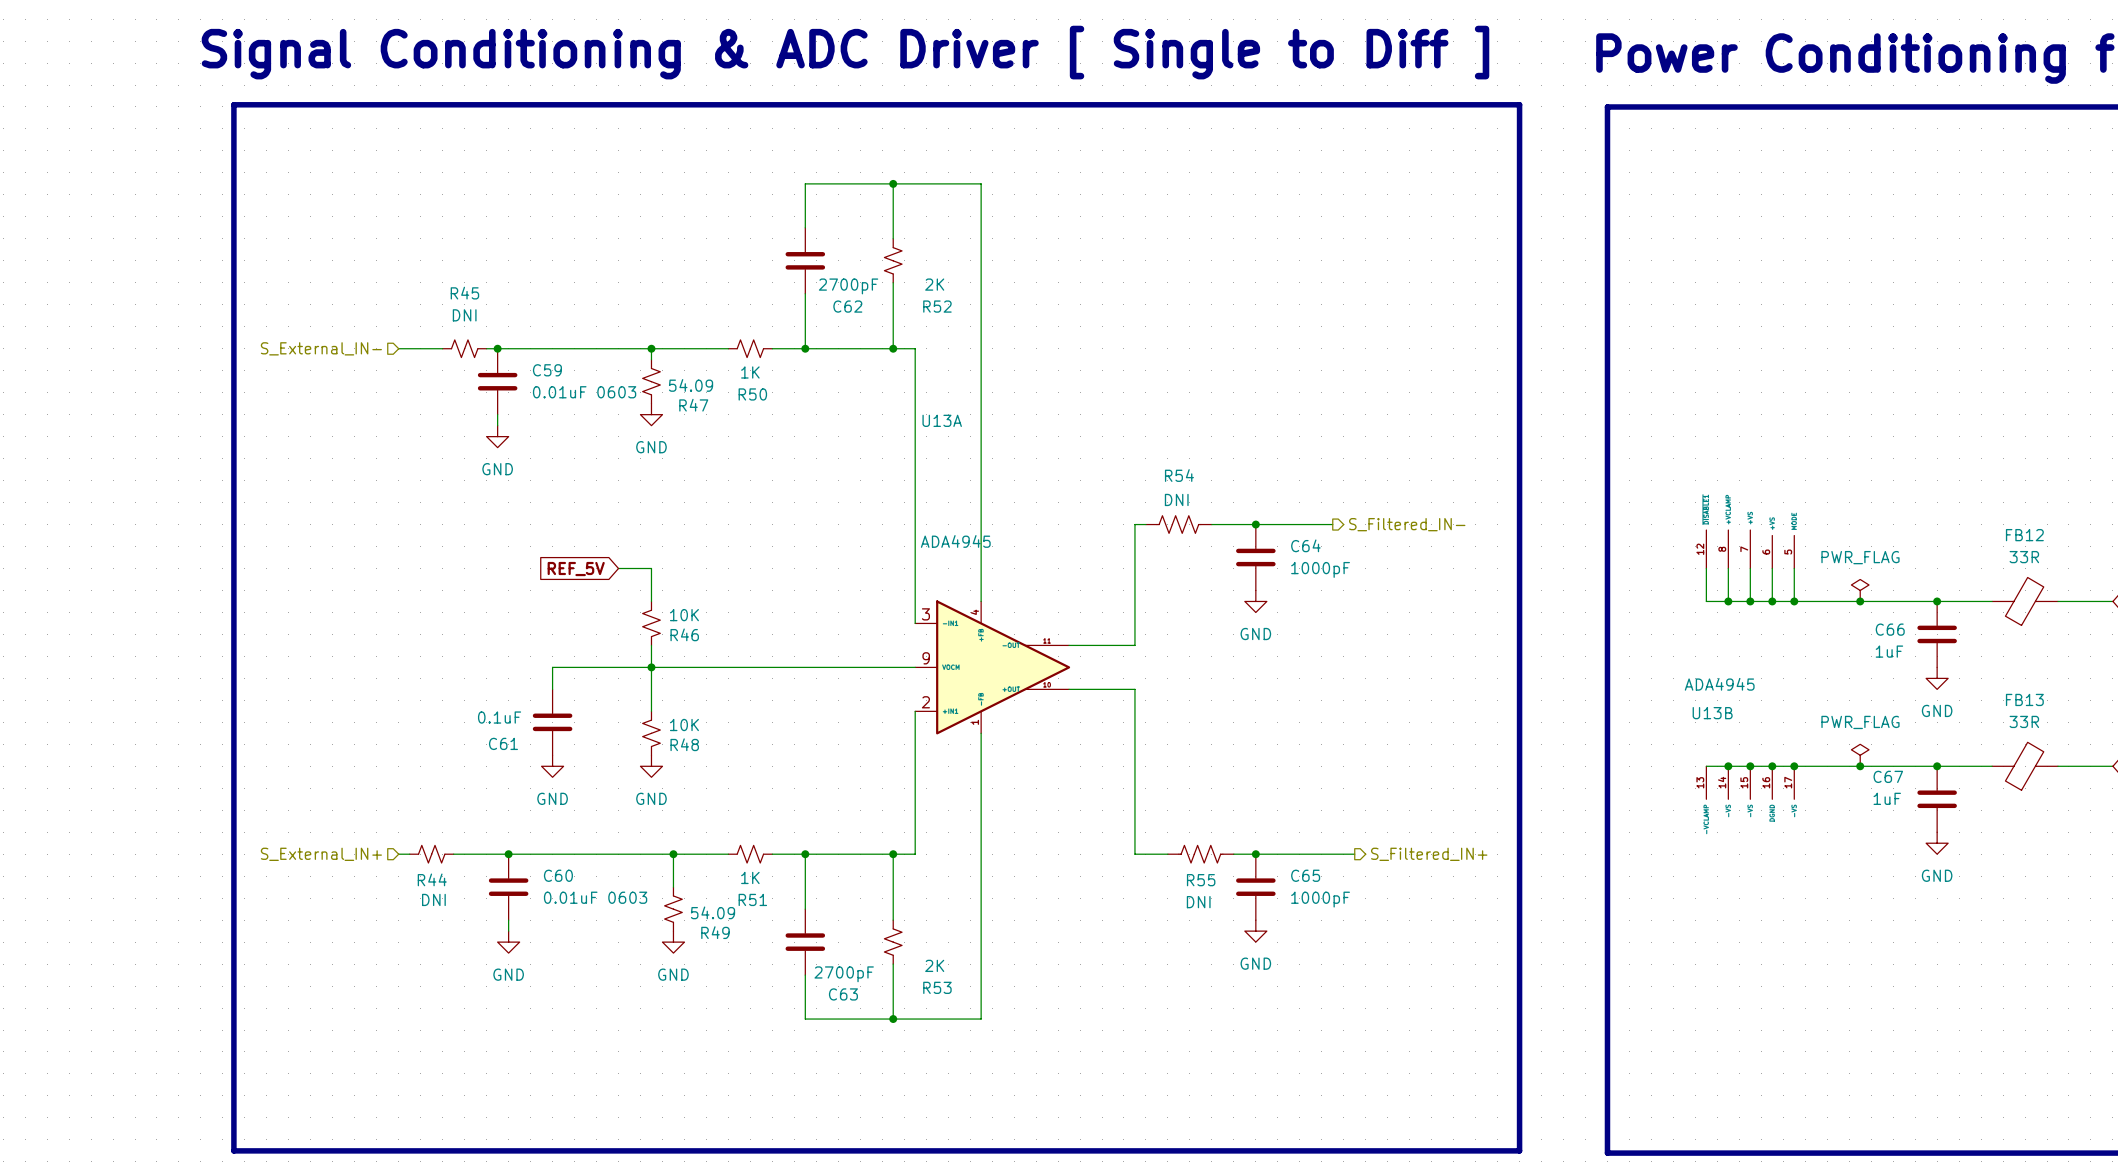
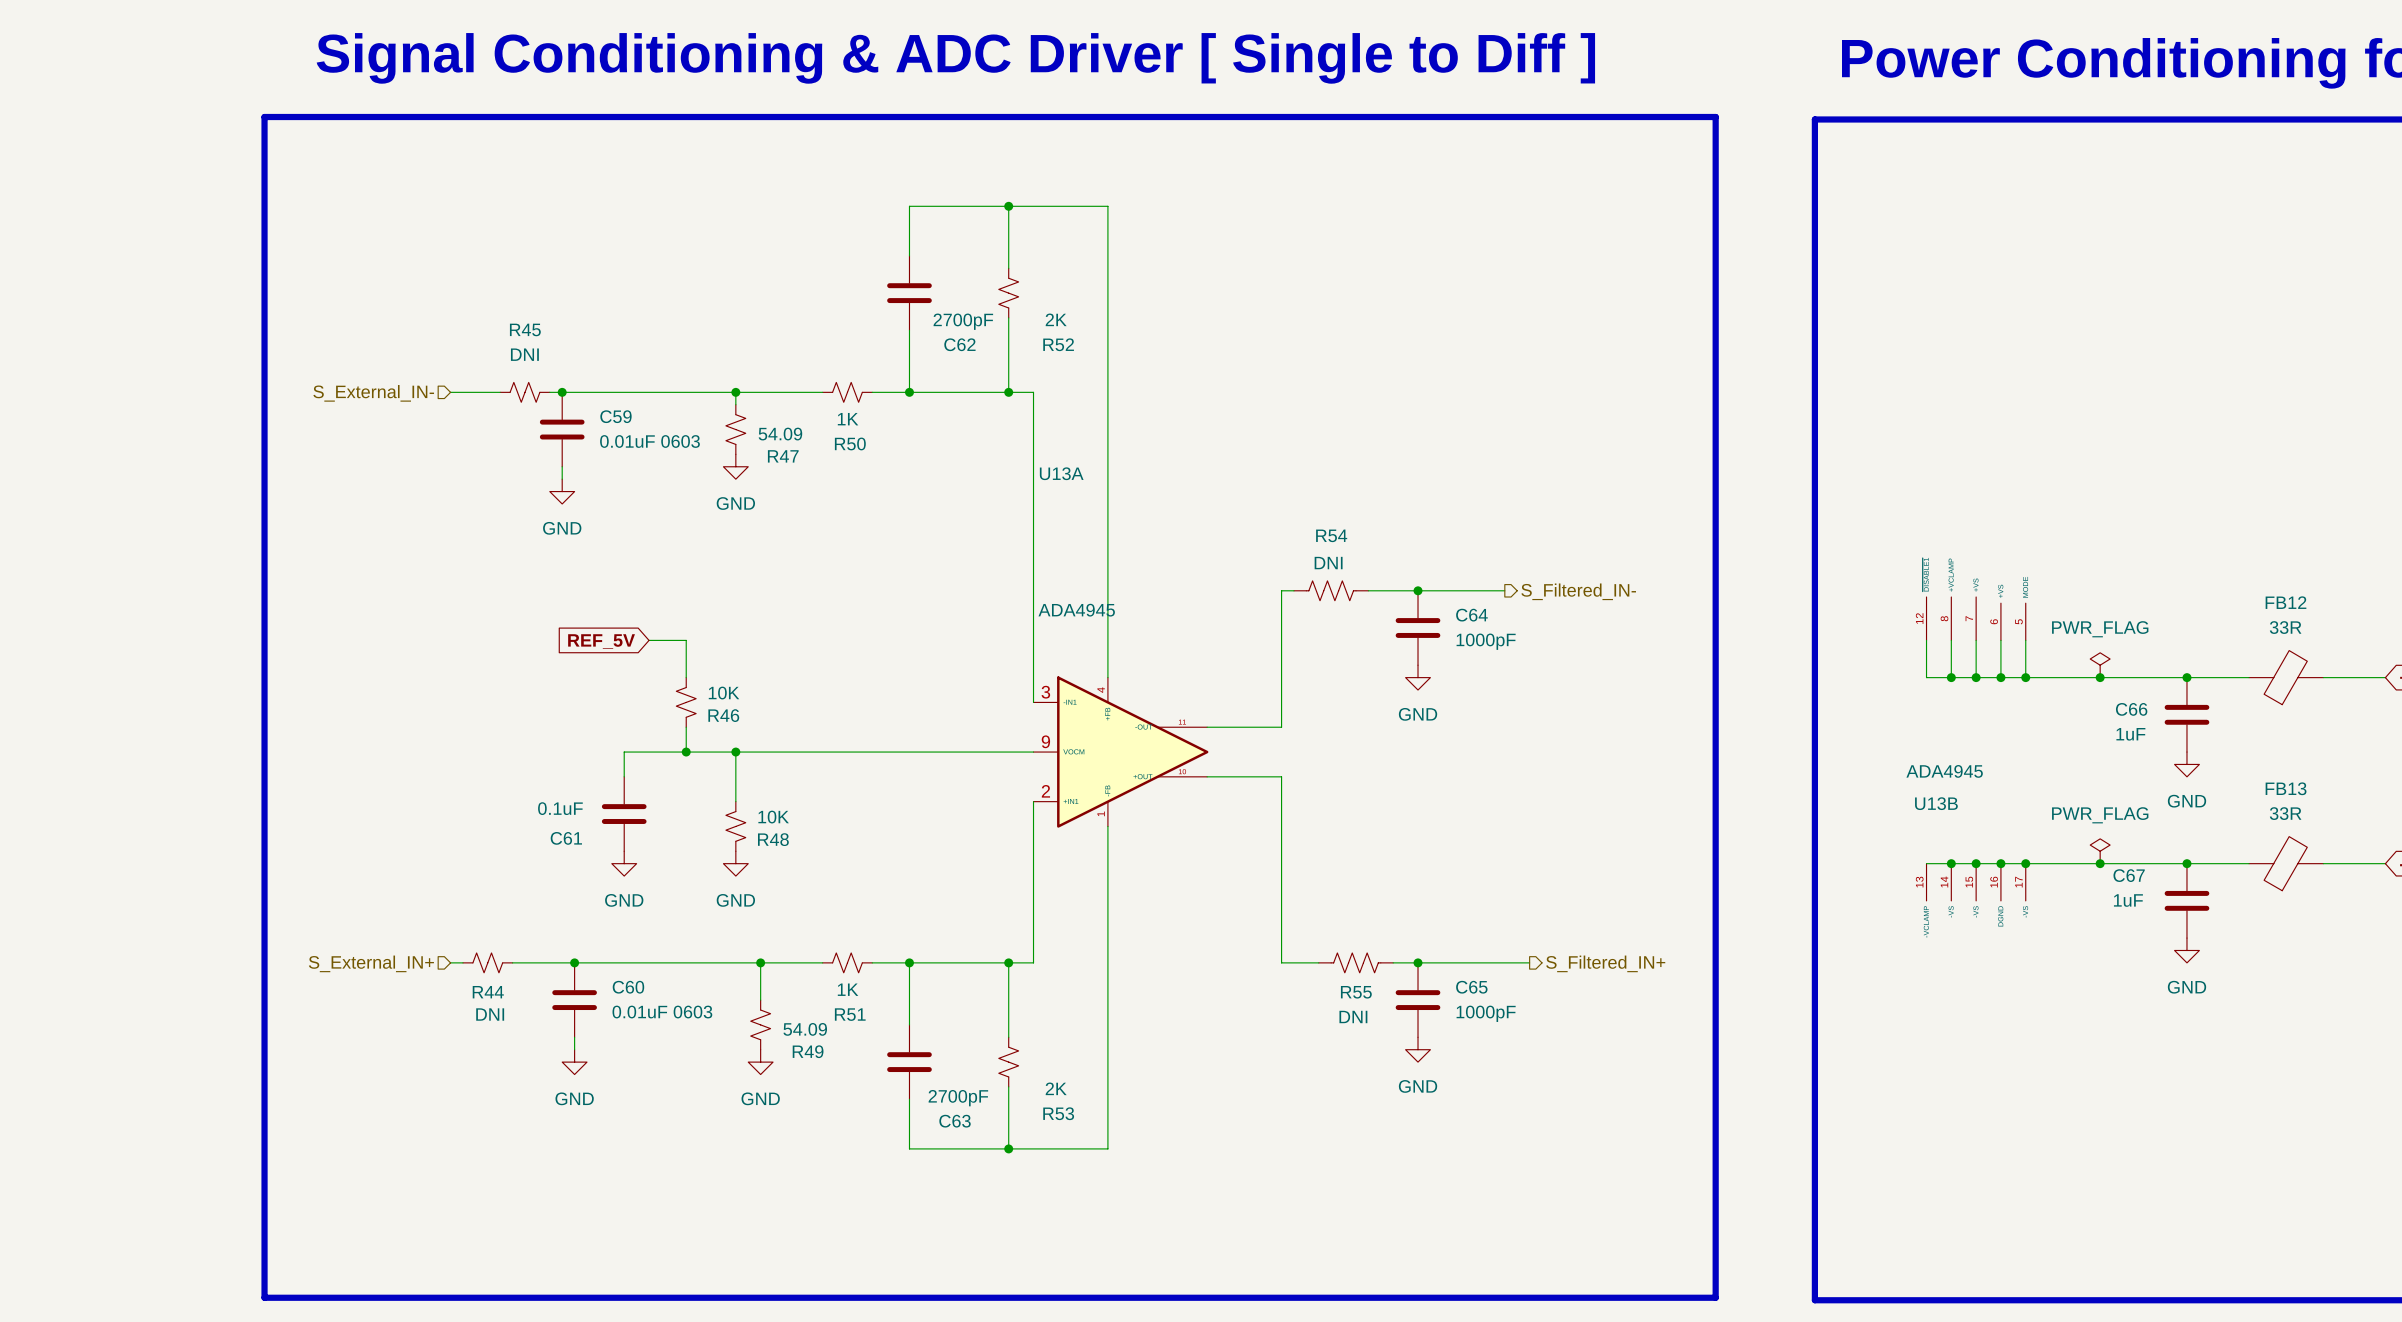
wire: (618, 568) (651, 568) (651, 601) -> (649, 640) (686, 640) (686, 677)
global label position: REF_5V (576, 569) -> REF_5V (601, 641)
R46 position: (651, 623) -> (686, 702)
wire: (651, 645) (651, 667) -> (686, 727) (686, 752)
junction: none -> (686, 752)

